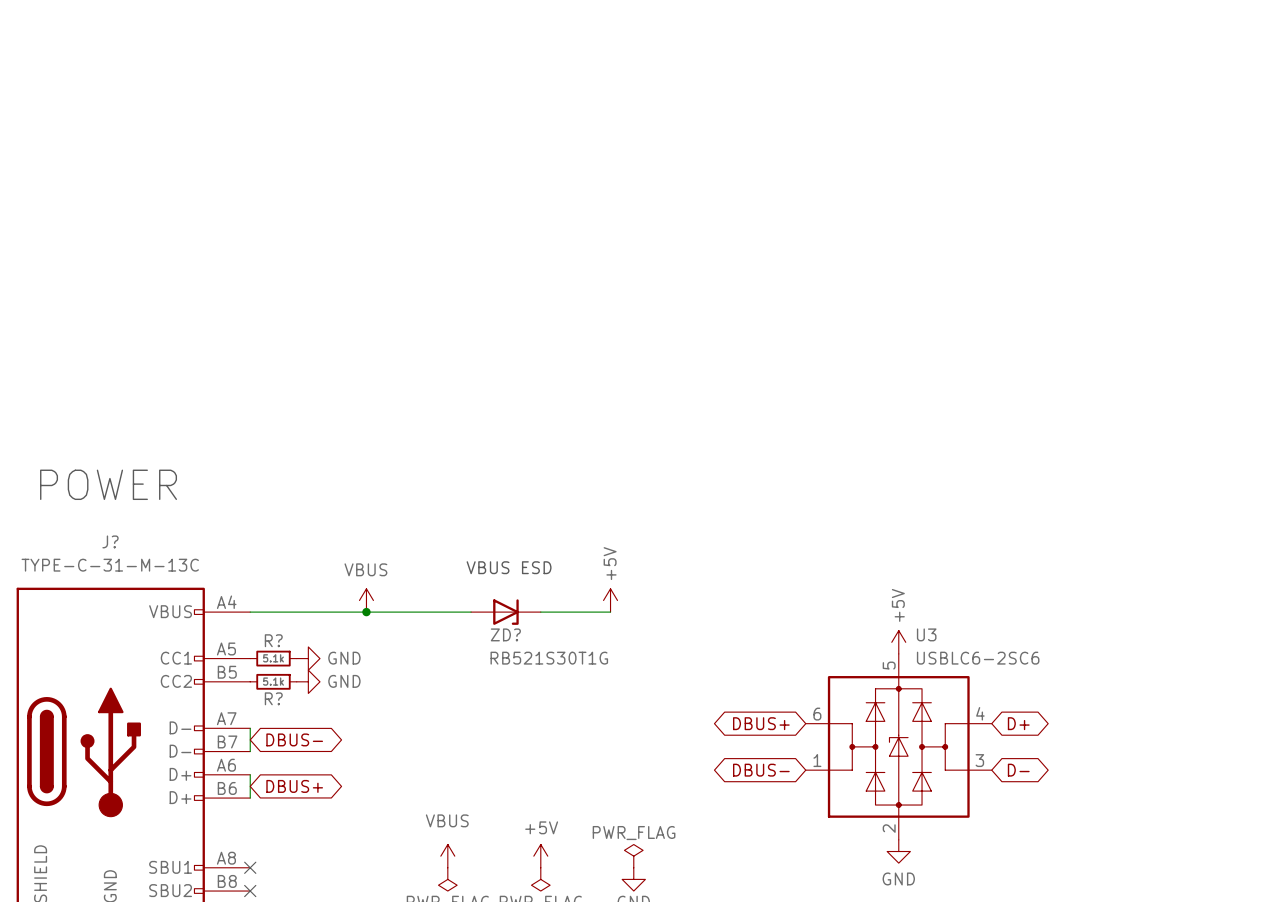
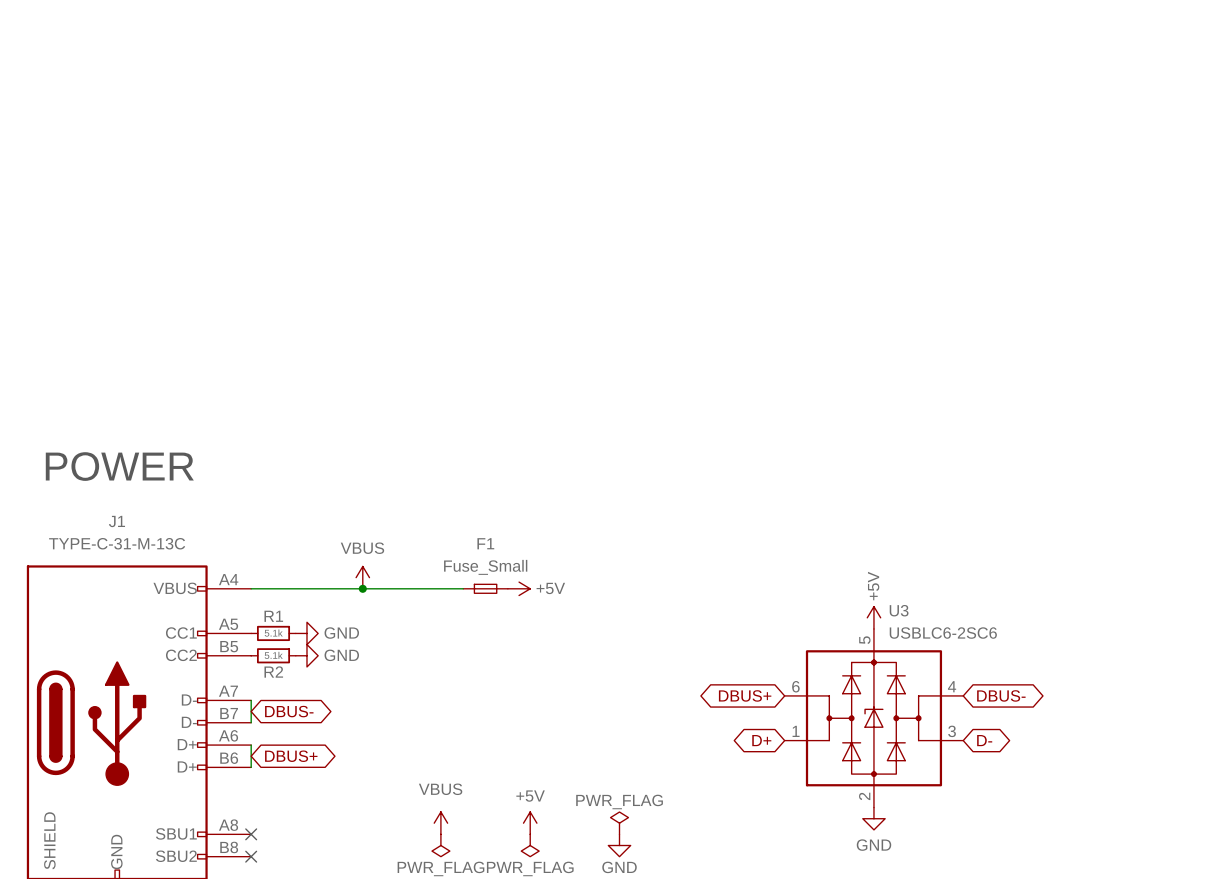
J? name: J? (110, 541) -> J1 (116, 521)
text: VBUS ESD (509, 567) -> none
power symbol rotation: 0° (610, 600) -> 90° clockwise (519, 588)
power symbol position: +5V (610, 600) -> +5V (519, 588)
F1: none -> Fuse_Small (485, 588)
ZD?: RB521S30T1G (505, 612) -> none
wire: (540, 612) (610, 612) -> none
R? name: R? (273, 640) -> R1 (273, 616)
R? name: R? (273, 698) -> R2 (273, 672)
global label: D+ (1018, 723) -> DBUS- (1001, 695)
global label: DBUS- (761, 770) -> D+ (761, 740)

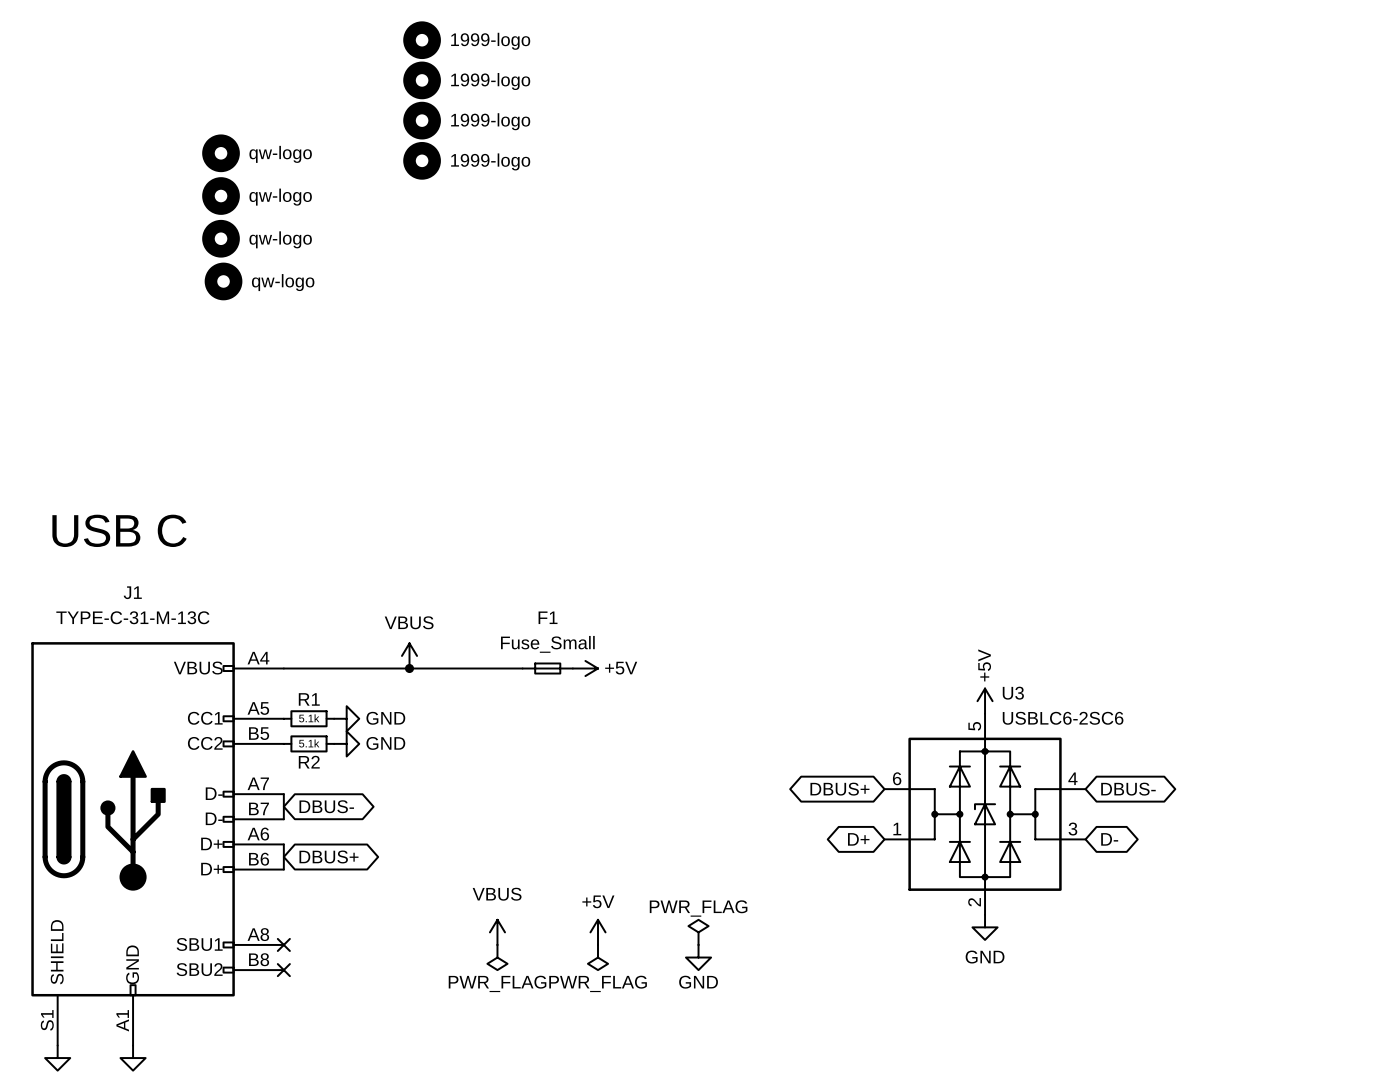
part: none -> 1999-logo (422, 40)
part: none -> 1999-logo (422, 80)
part: none -> 1999-logo (422, 120)
part: none -> qw-logo (221, 153)
part: none -> 1999-logo (422, 160)
part: none -> qw-logo (221, 196)
part: none -> qw-logo (221, 238)
part: none -> qw-logo (223, 281)
text: POWER (119, 466) -> USB C (119, 530)

